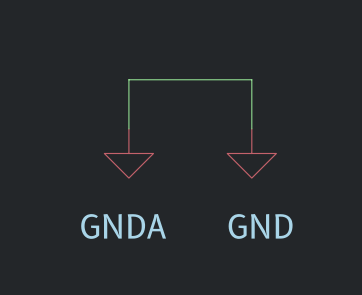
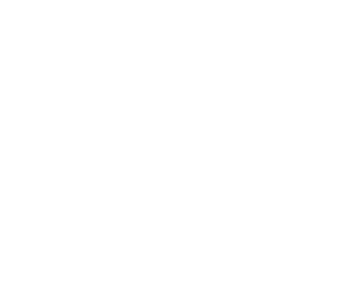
wire: (128, 128) (128, 79) (251, 79) (251, 128) -> none
power symbol: GNDA (128, 153) -> none
power symbol: GND (251, 153) -> none

